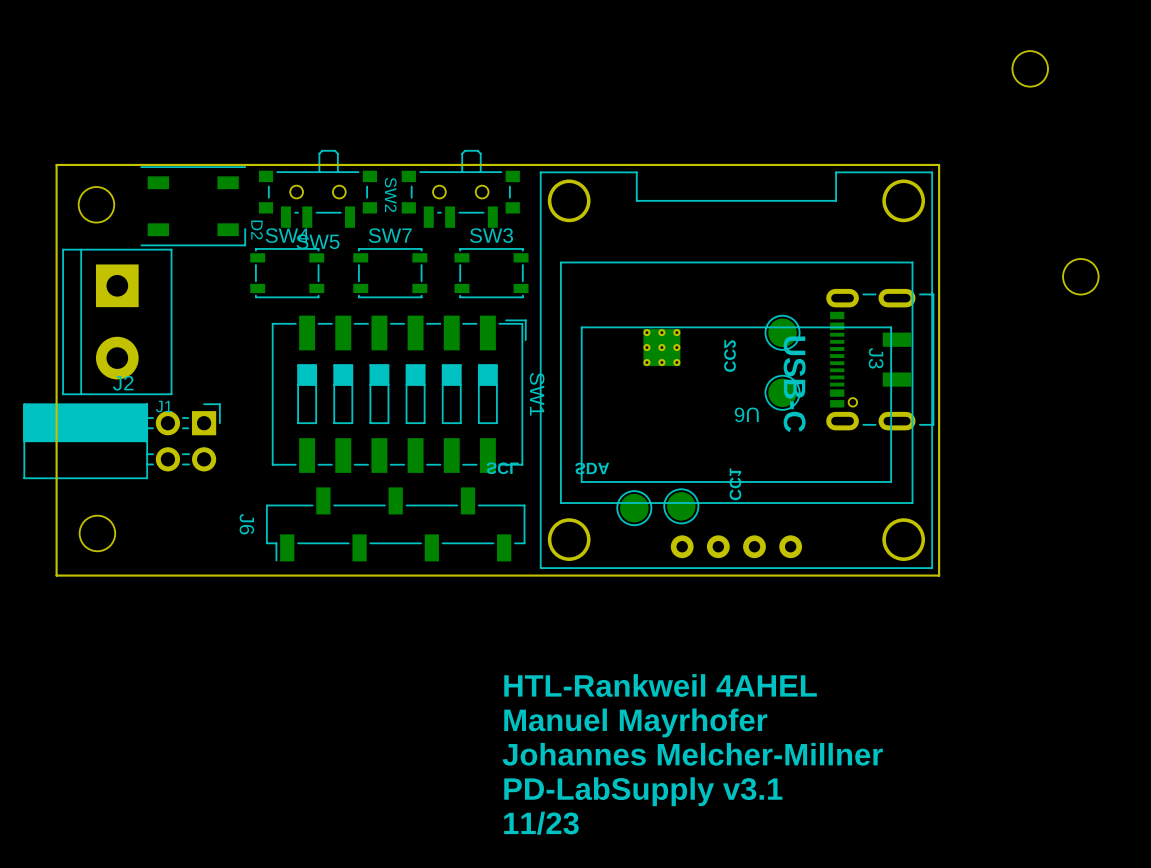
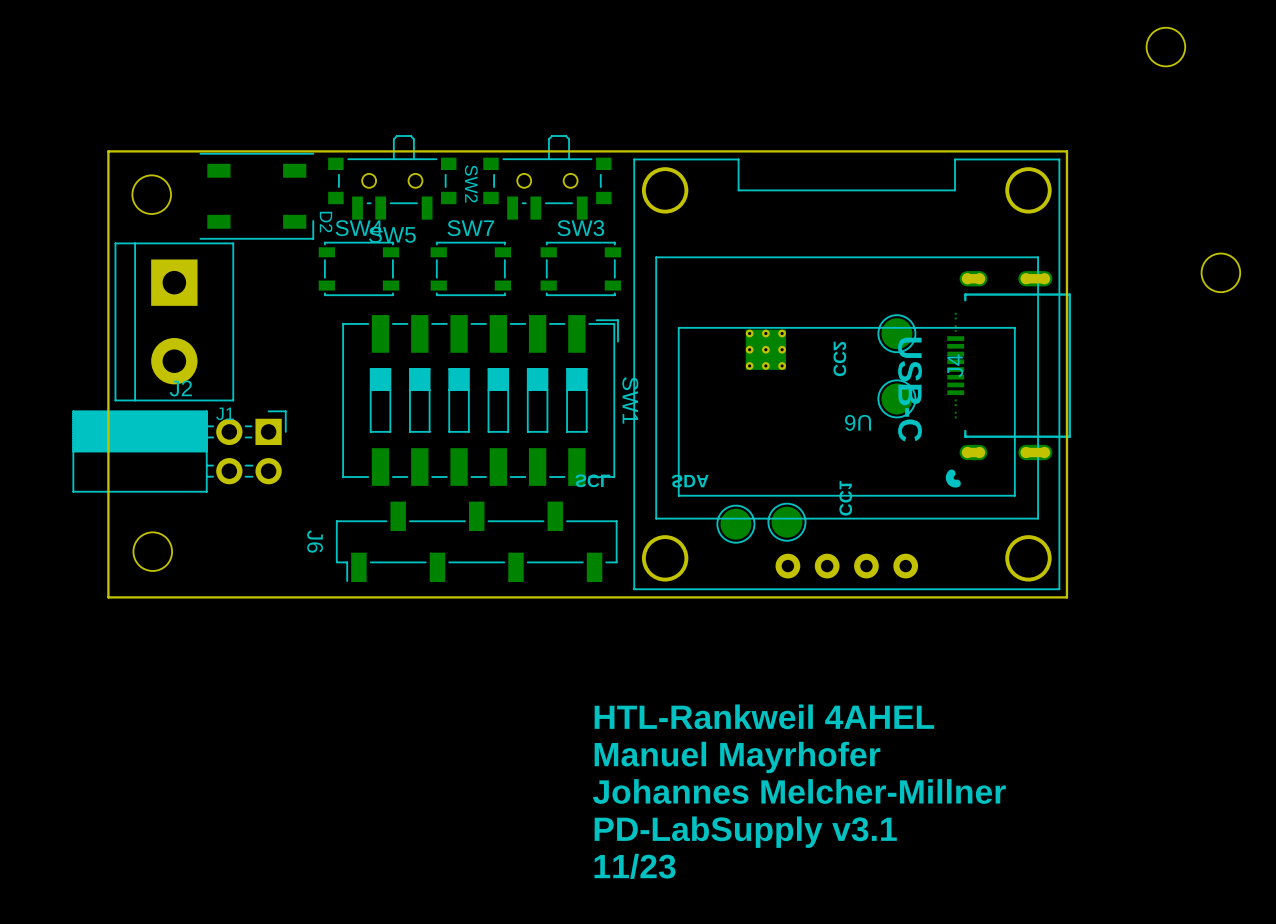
J3: (880, 359) -> none
J4: none -> (1008, 379)

